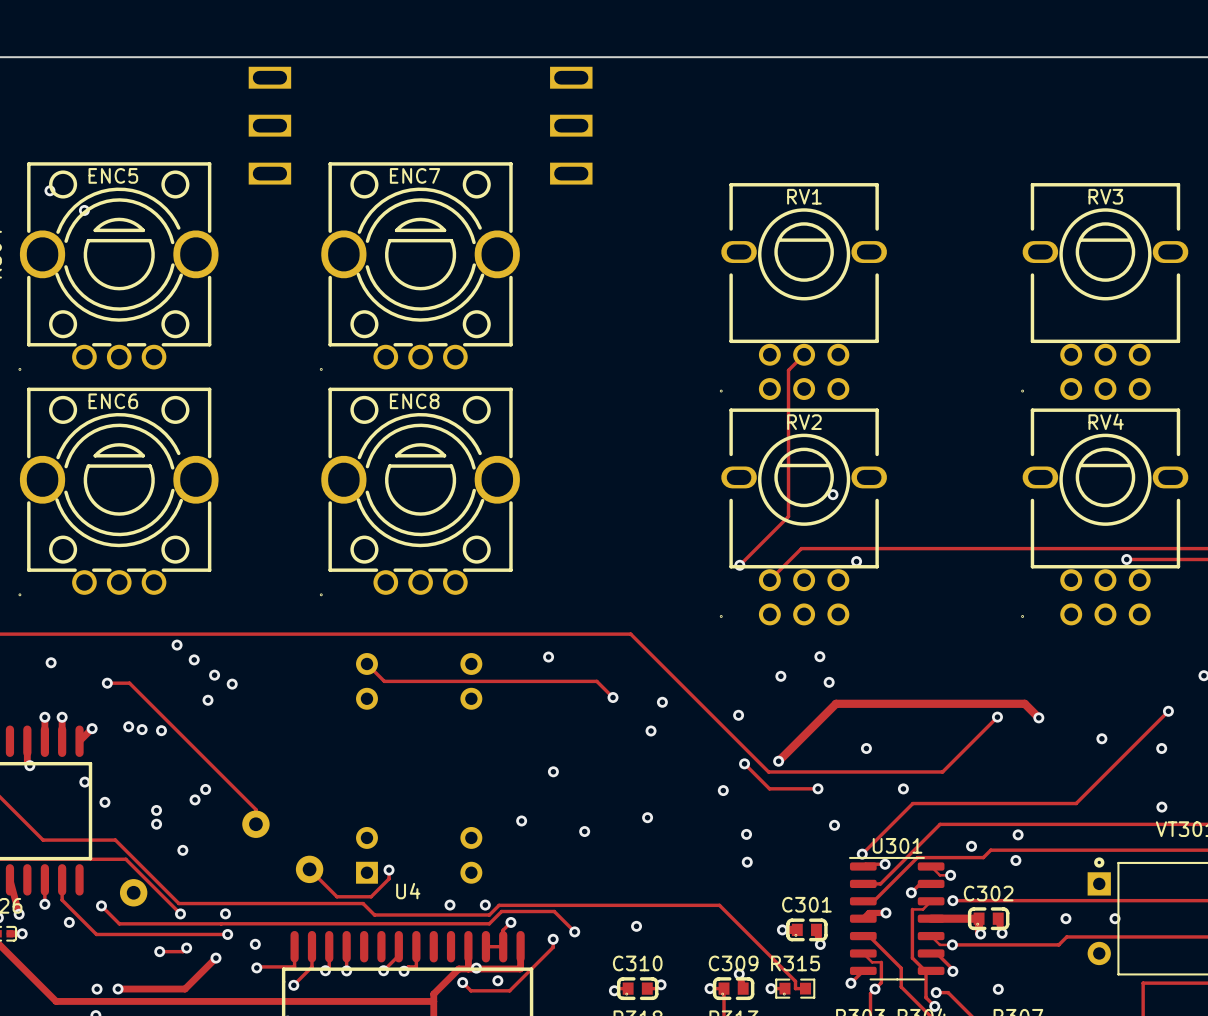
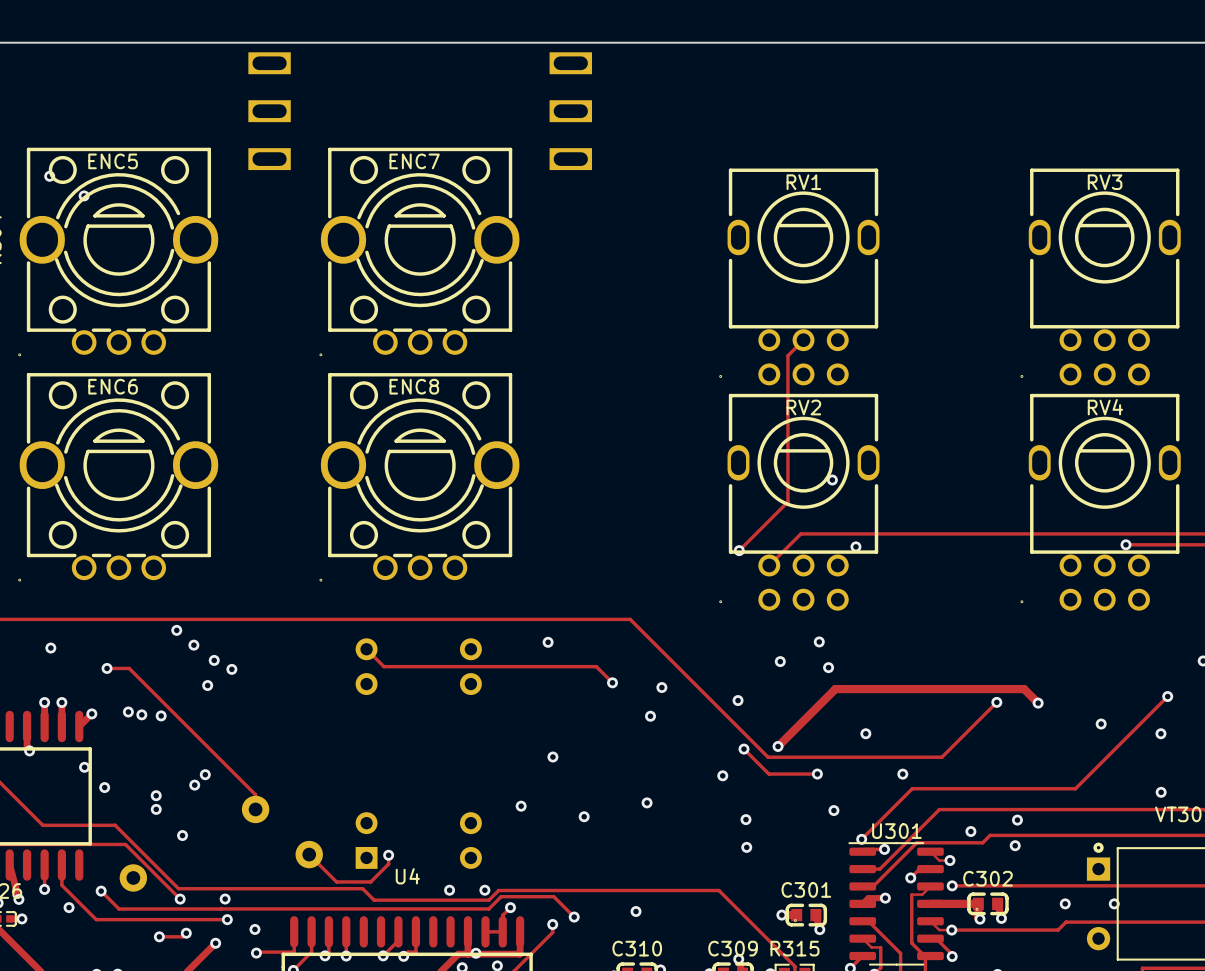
RV1 footprint: [720, 183, 887, 400] -> [719, 168, 880, 386]
RV3 footprint: [1021, 183, 1189, 400] -> [1021, 168, 1181, 386]
RV2 footprint: [720, 408, 887, 626] -> [719, 393, 880, 611]
RV4 footprint: [1021, 408, 1189, 626] -> [1021, 393, 1181, 611]

